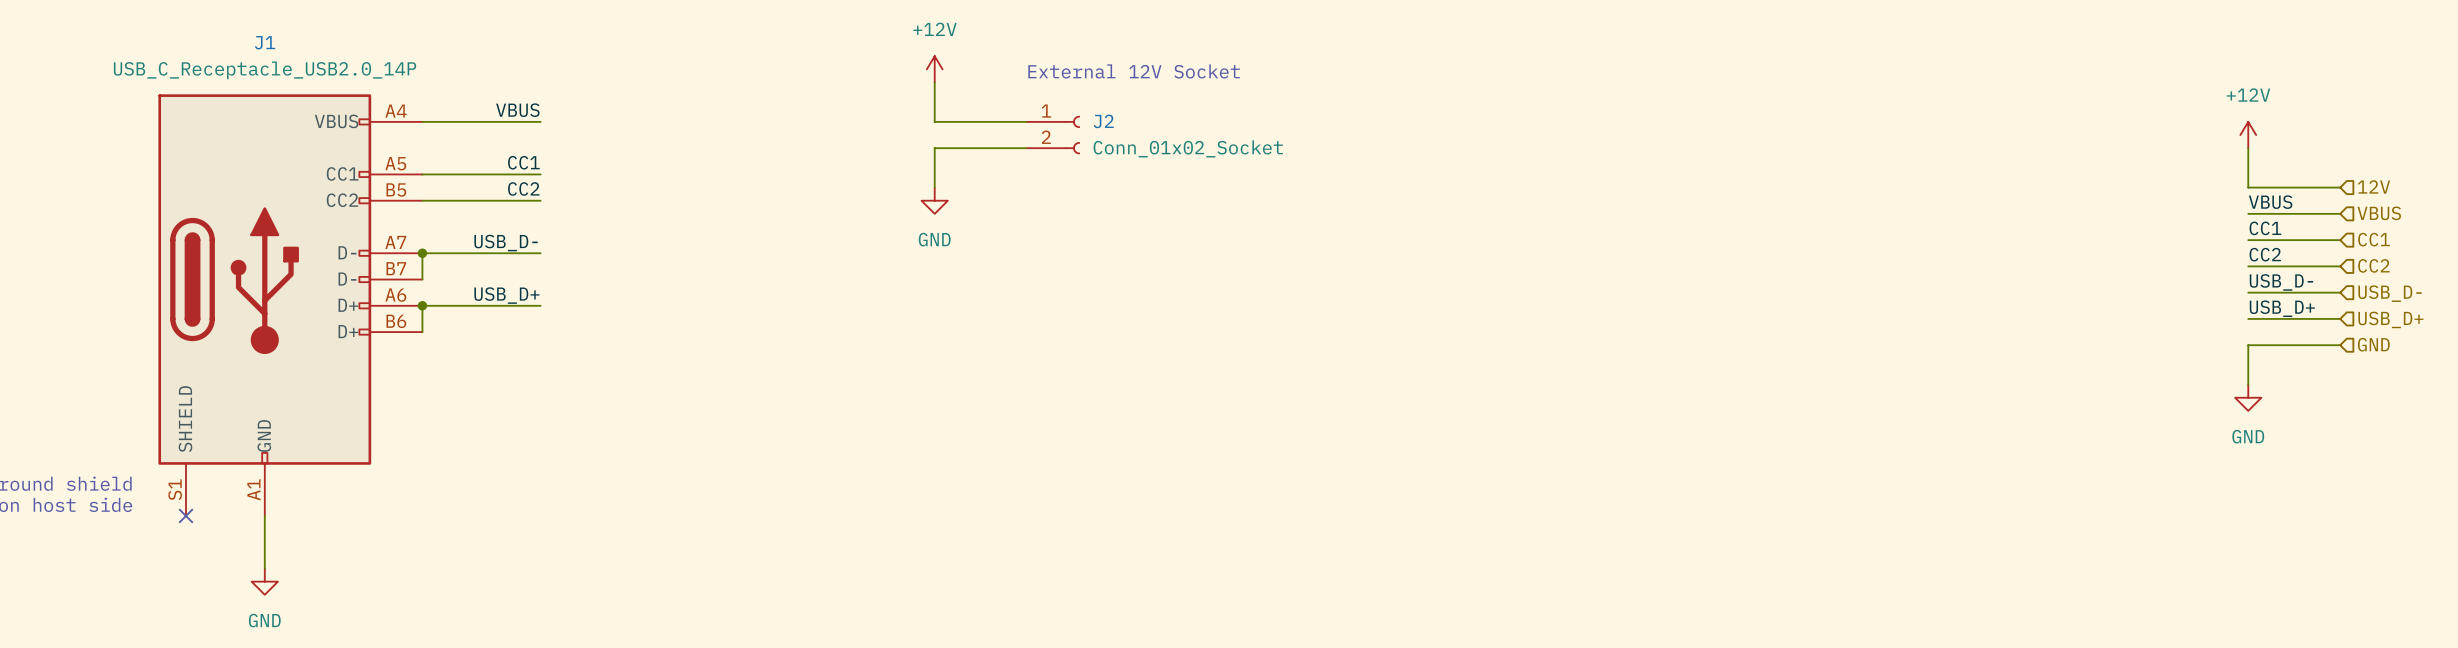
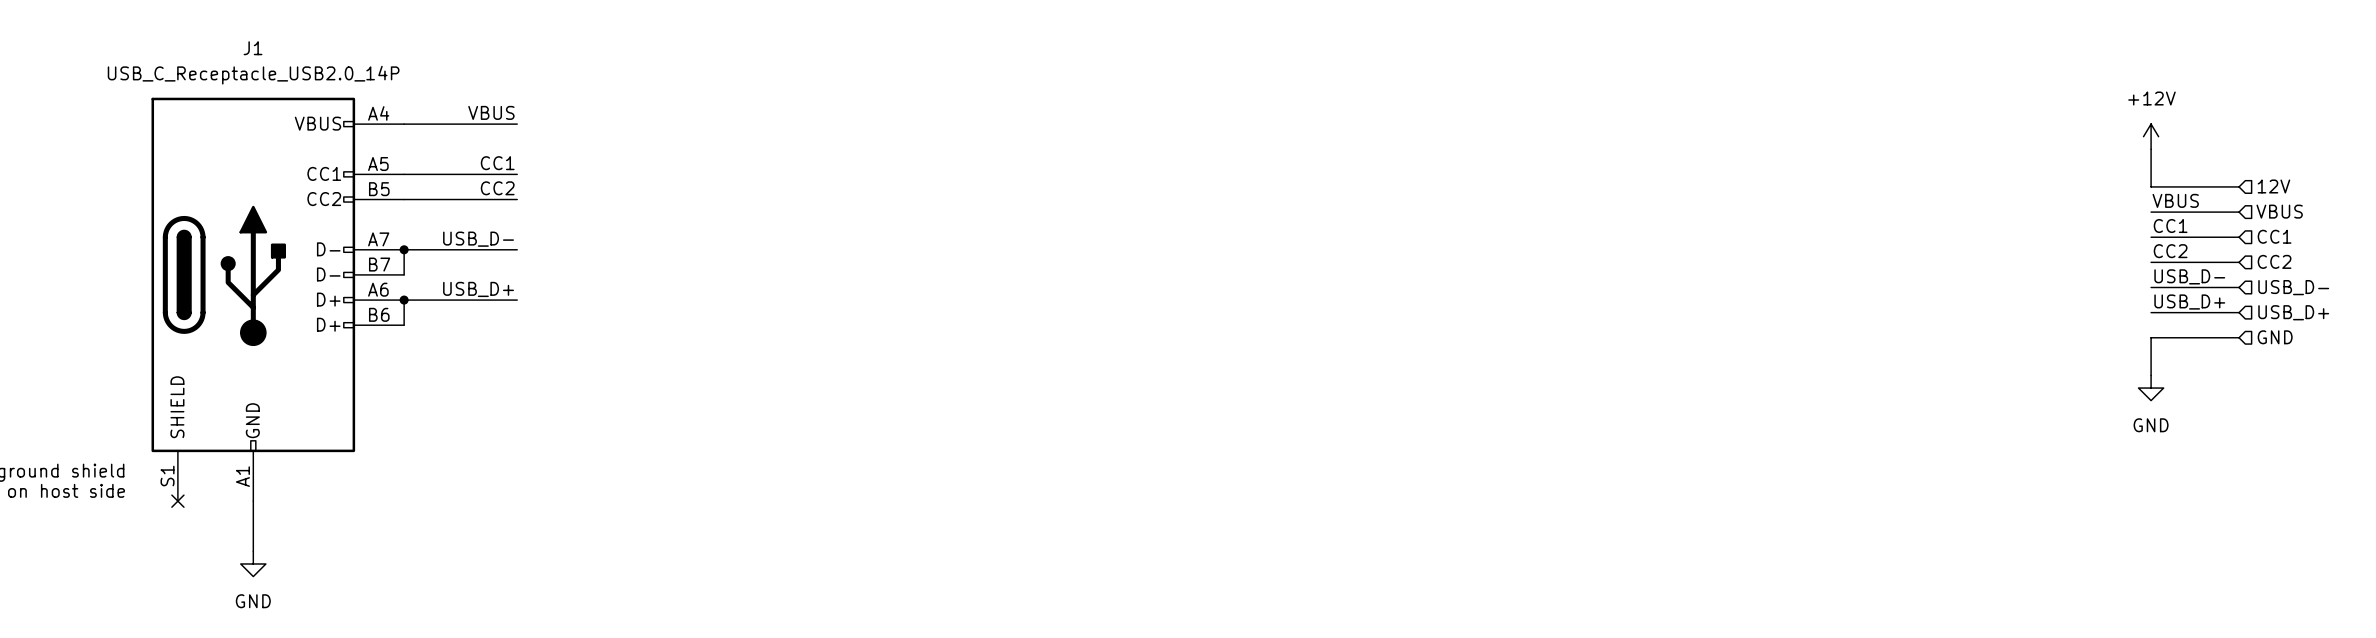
power symbol: +12V (934, 69) -> none
text: External 12V Socket (1134, 71) -> none
wire: (934, 82) (934, 121) (1026, 121) -> none
J2: Conn_01x02_Socket (1053, 135) -> none
wire: (1026, 148) (934, 148) (934, 187) -> none
power symbol: GND (934, 200) -> none

